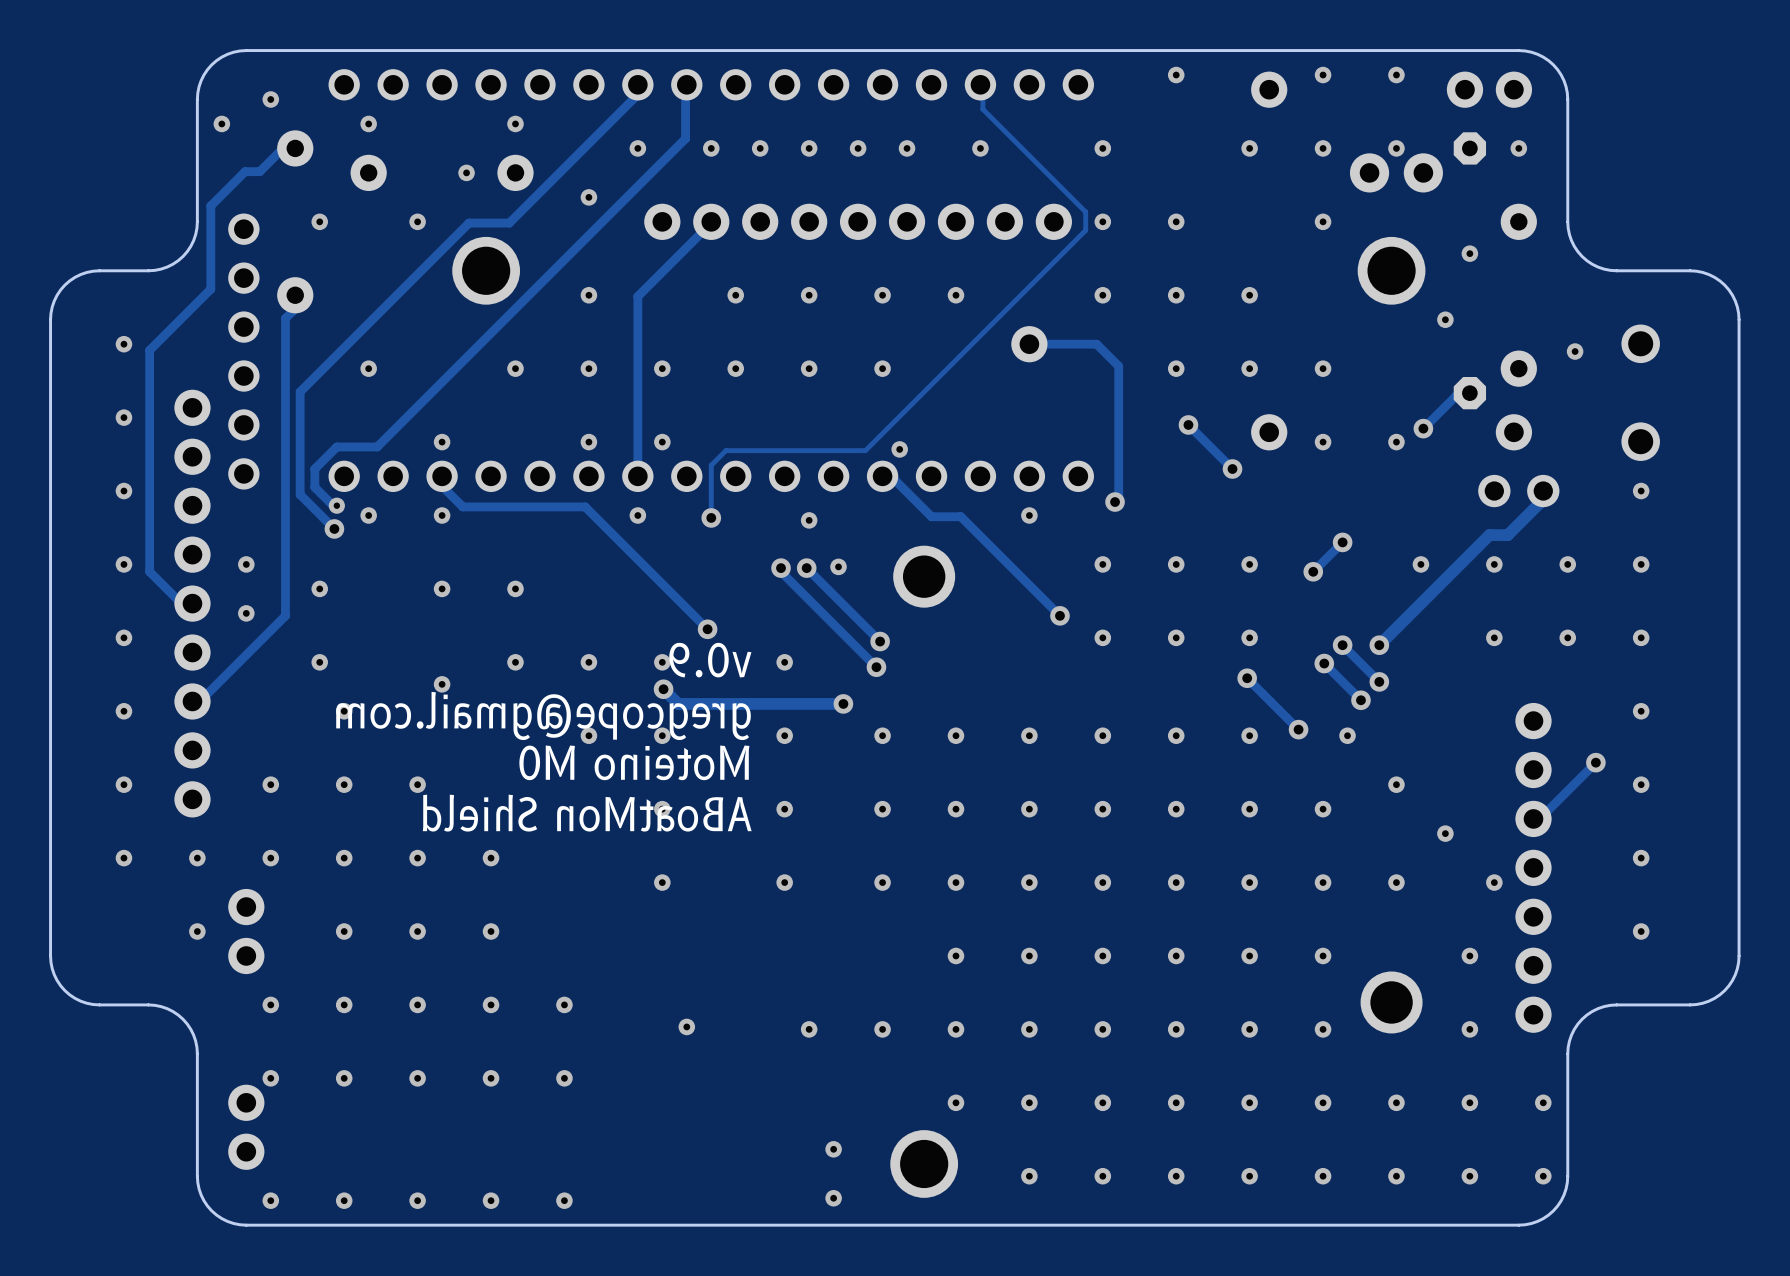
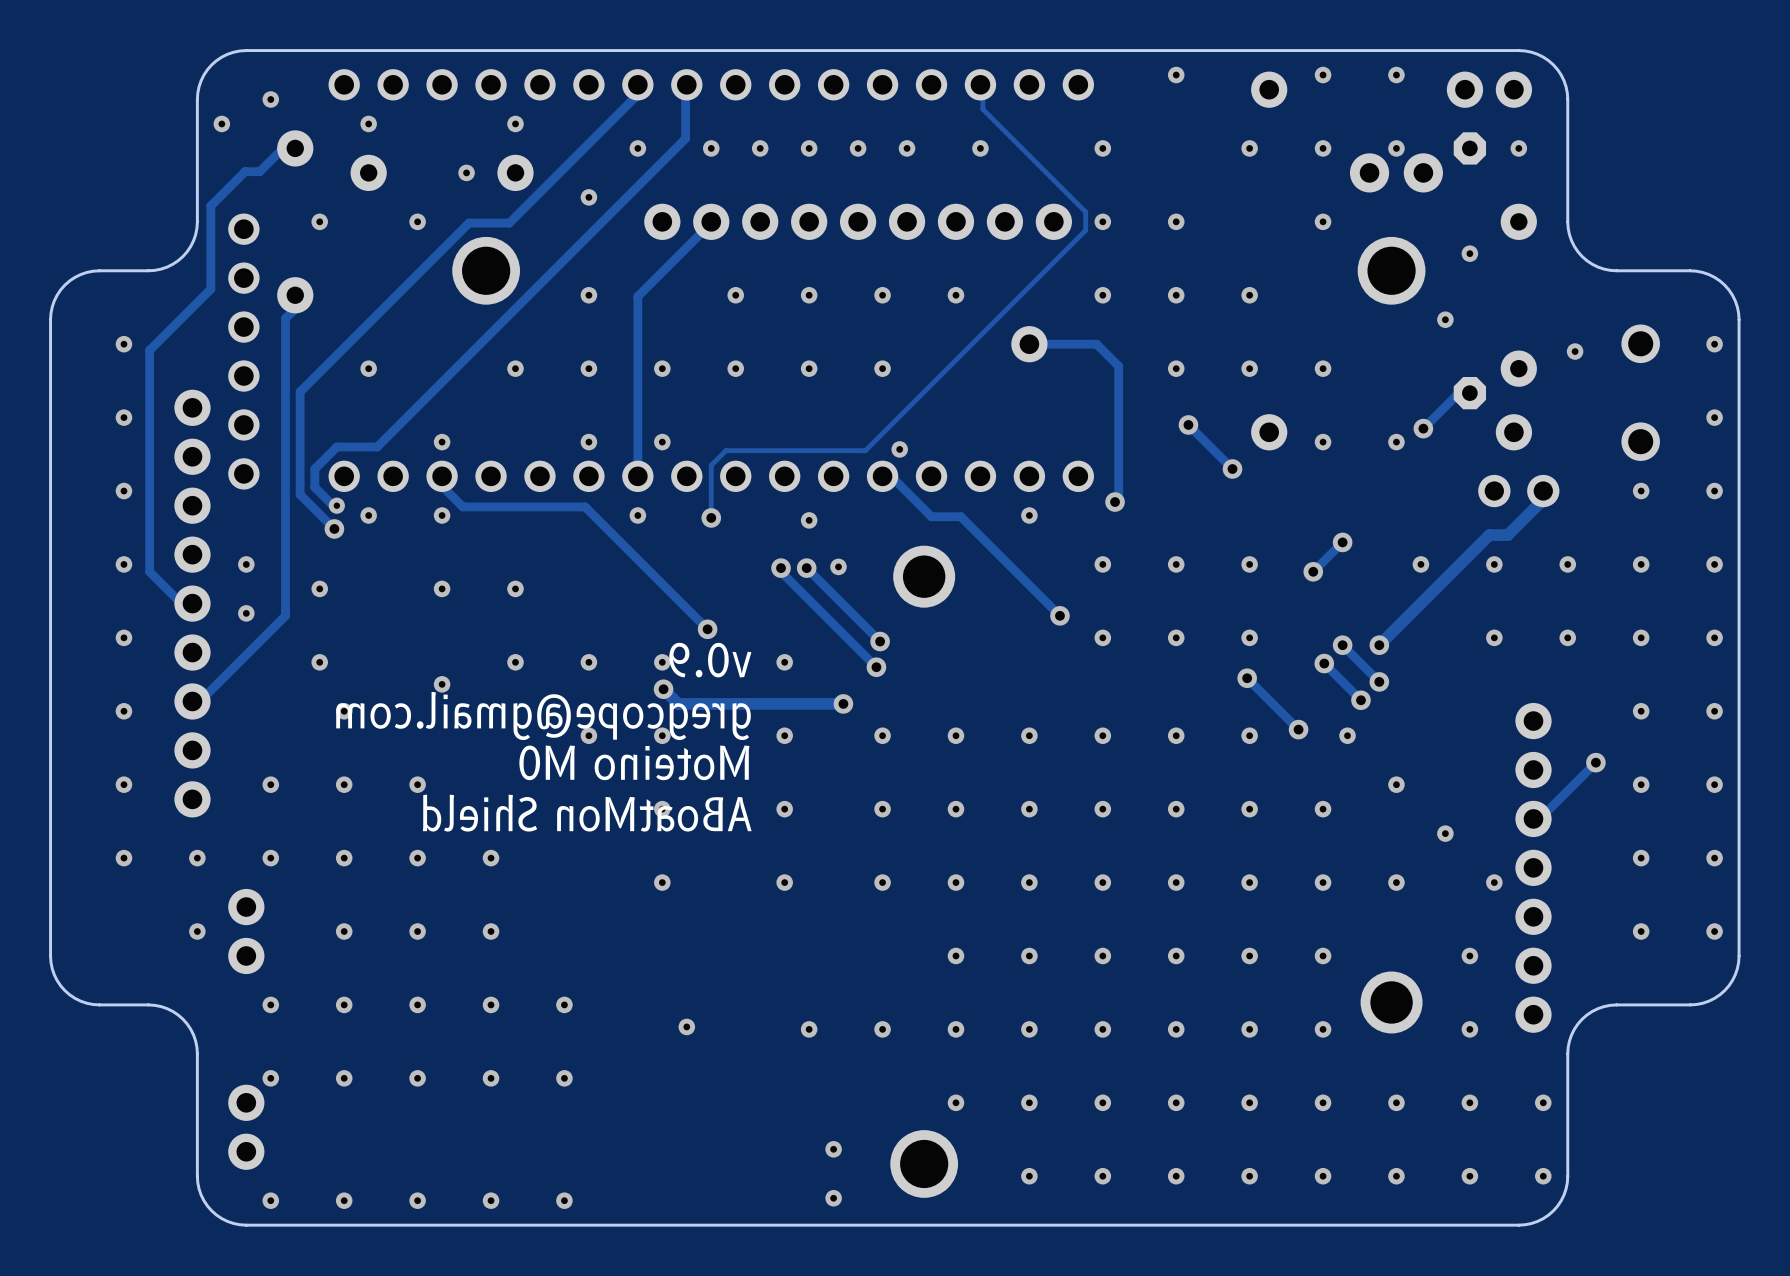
via: none -> (1714, 344)
via: none -> (1714, 417)
via: none -> (1714, 491)
via: none -> (1714, 564)
via: none -> (1714, 637)
via: none -> (1714, 711)
via: none -> (1714, 784)
via: none -> (1714, 858)
via: none -> (1714, 931)

